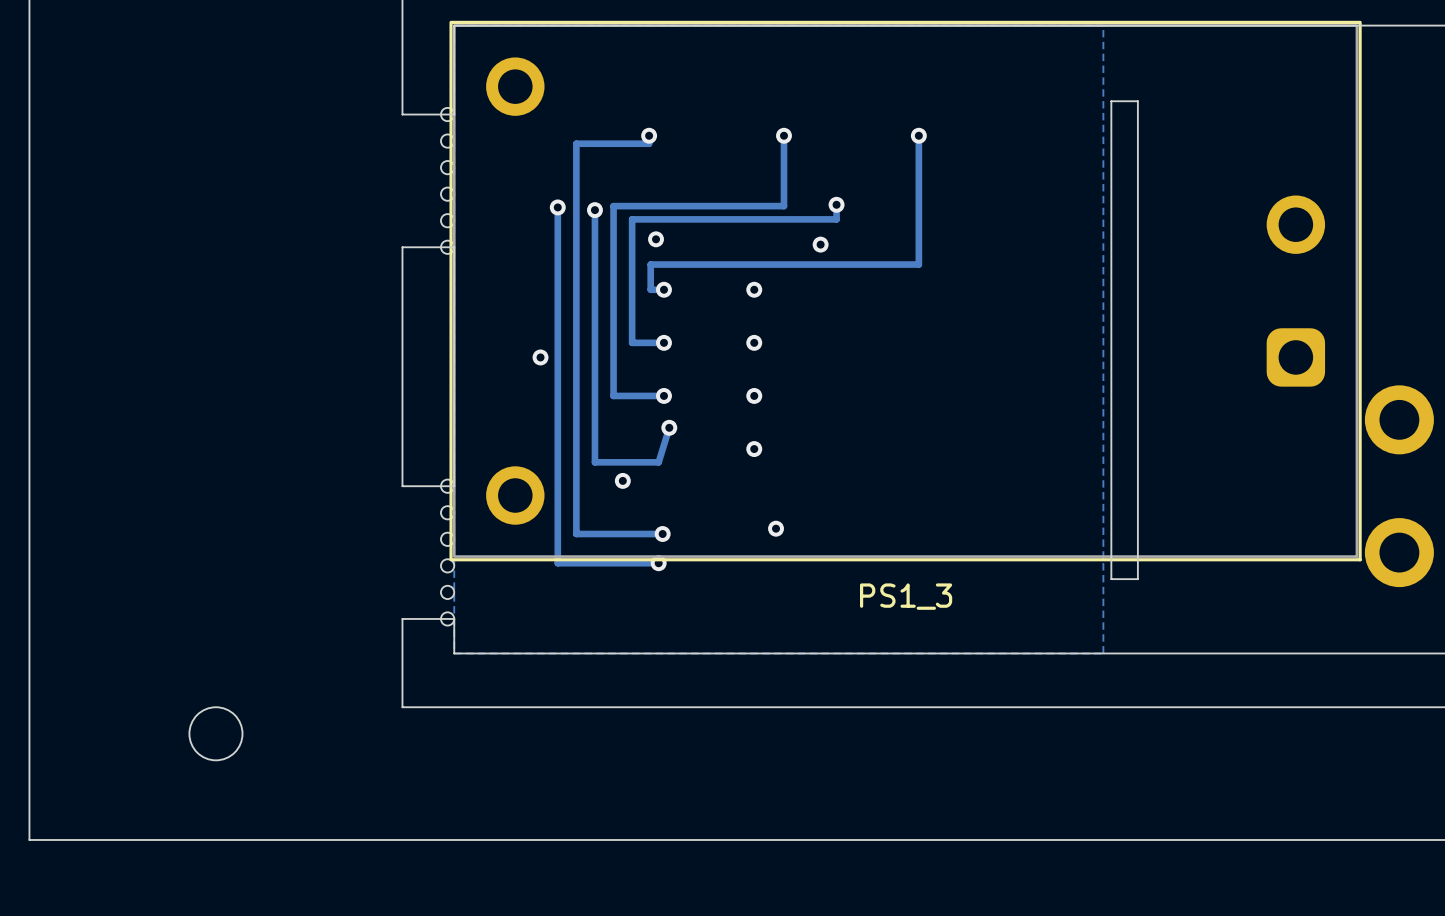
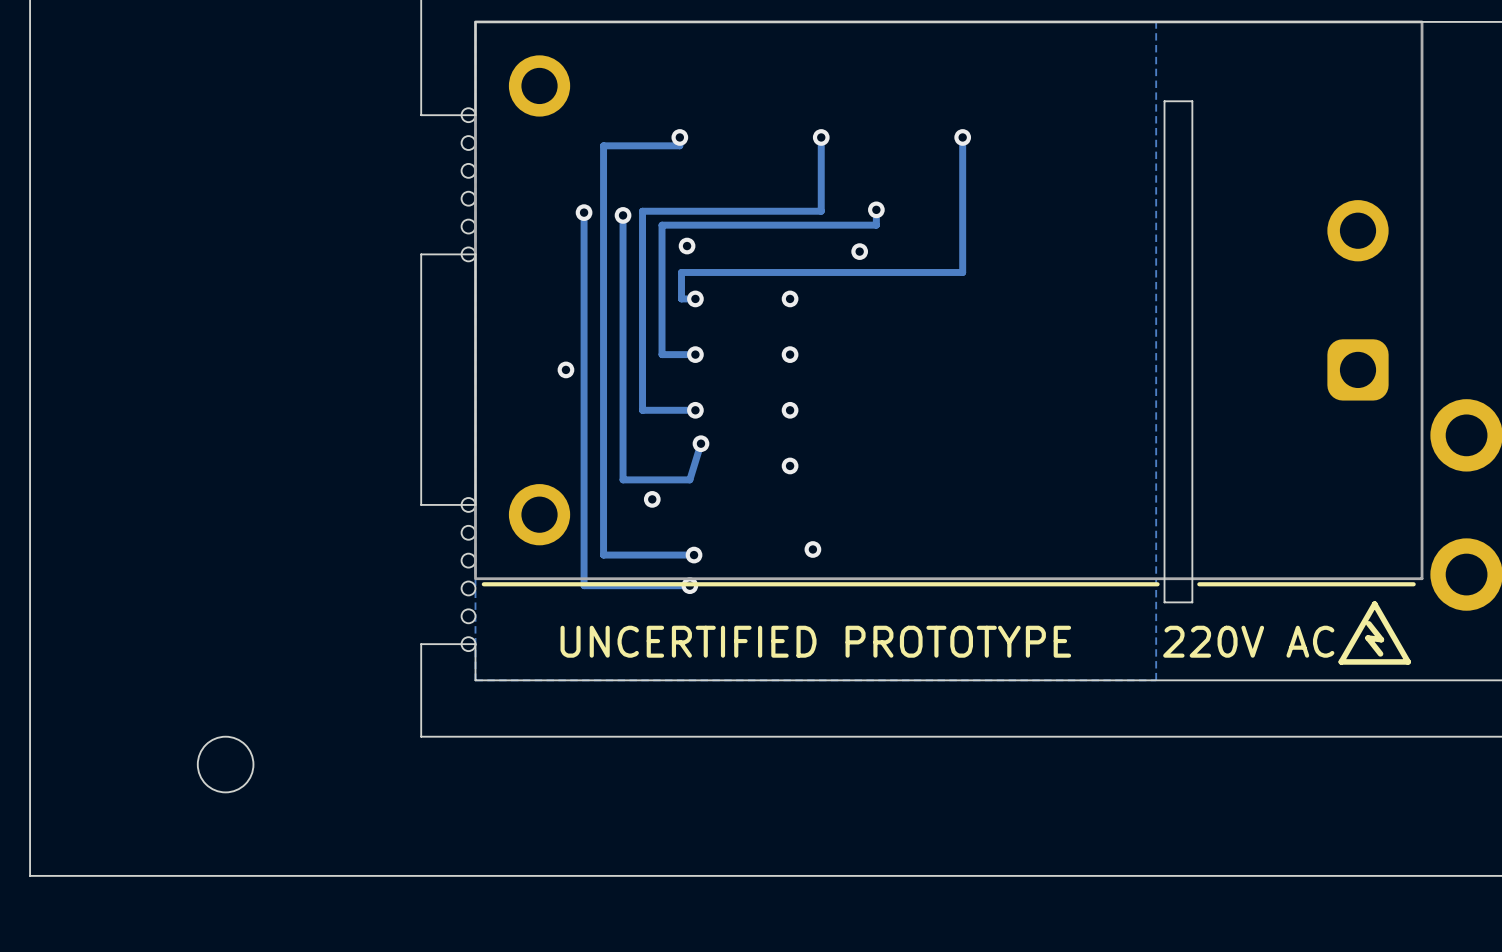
PS1_3: (905, 291) -> none
part: none -> (948, 300)
line: none -> (1157, 584) (483, 584)
line: none -> (1413, 584) (1199, 584)
line: none -> (1374, 604) (1408, 661) (1341, 661) (1374, 604)
line: none -> (1368, 623) (1381, 639) (1368, 638) (1380, 653)
text: none -> UNCERTIFIED PROTOTYPE (815, 641)
text: none -> 220V AC (1248, 641)

